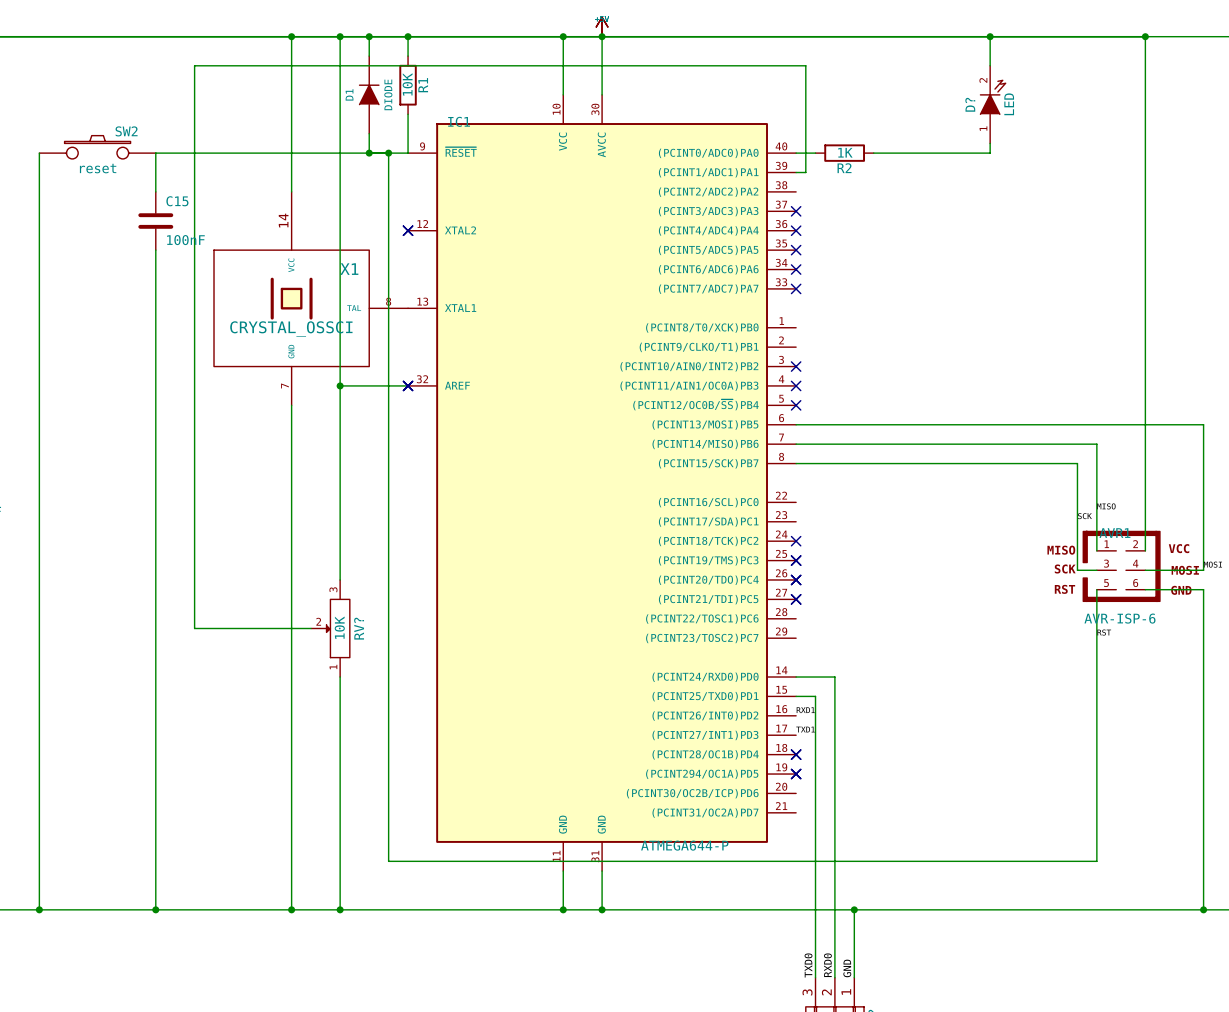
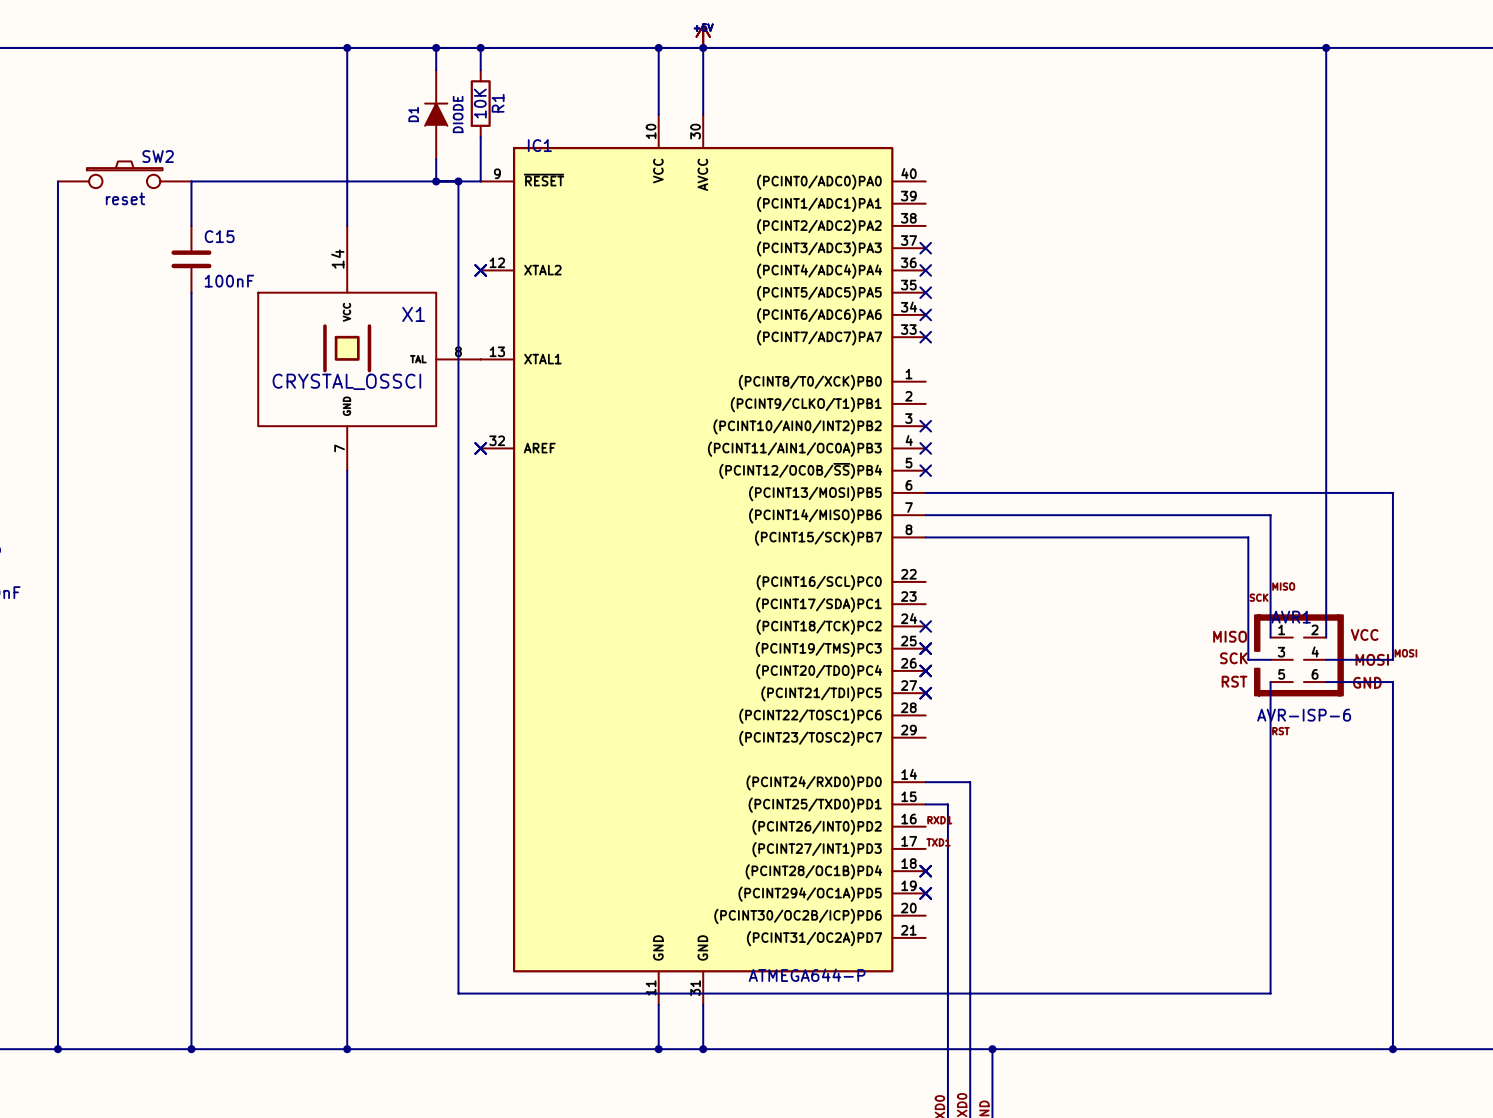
wire: (340, 36) (340, 579) -> none
junction: (340, 36) -> none
wire: (990, 36) (990, 65) -> none
junction: (990, 36) -> none
D?: LED (993, 104) -> none
wire: (990, 143) (990, 153) (873, 153) -> none
wire: (796, 153) (815, 153) -> none
R2: 1K (844, 153) -> none
wire: (796, 172) (805, 172) (805, 65) (194, 65) (194, 628) (311, 628) -> none
wire: (340, 385) (408, 385) -> none
junction: (340, 385) -> none
RV?: 10K (330, 628) -> none
wire: (340, 677) (340, 909) -> none
junction: (340, 909) -> none

